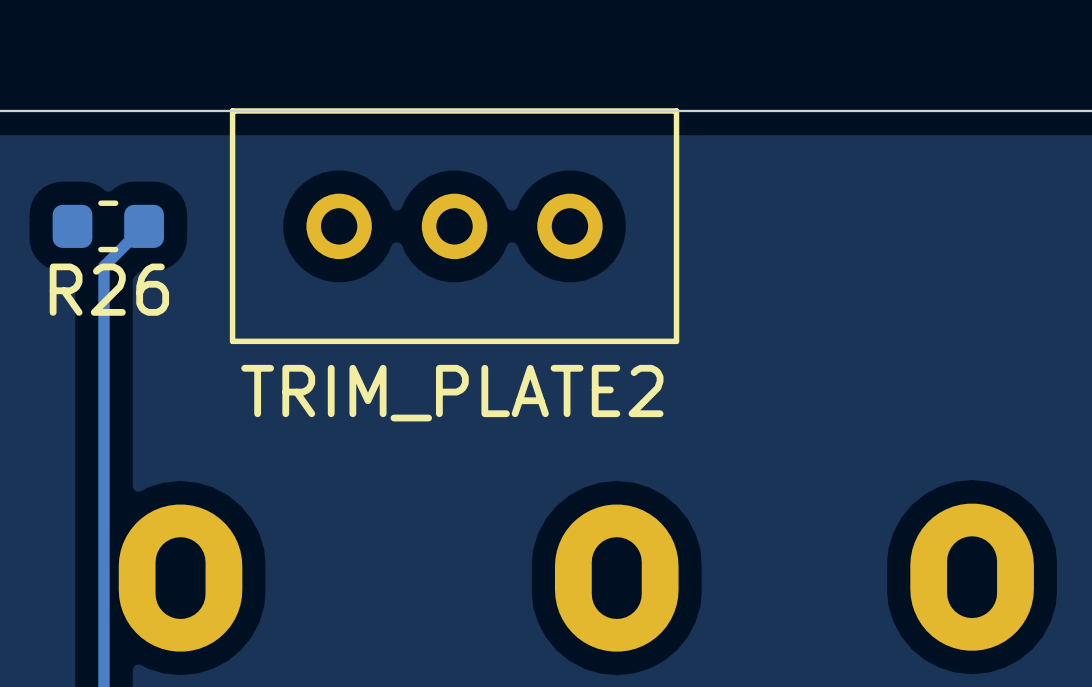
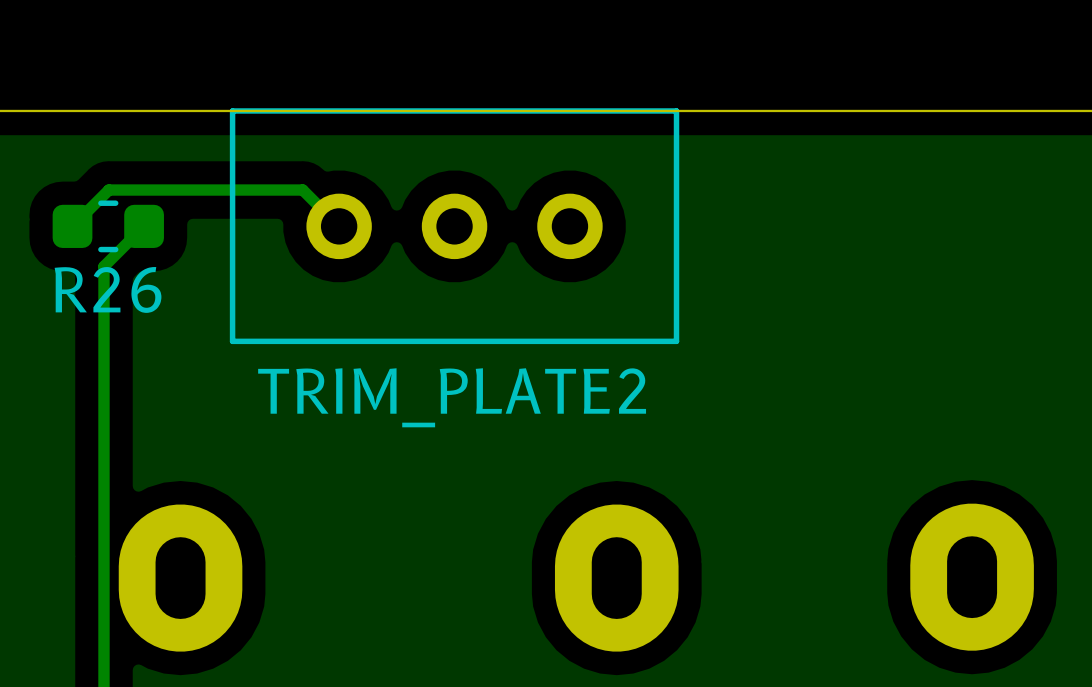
track: none -> (339, 226) (302, 190) (108, 190) (72, 226)

